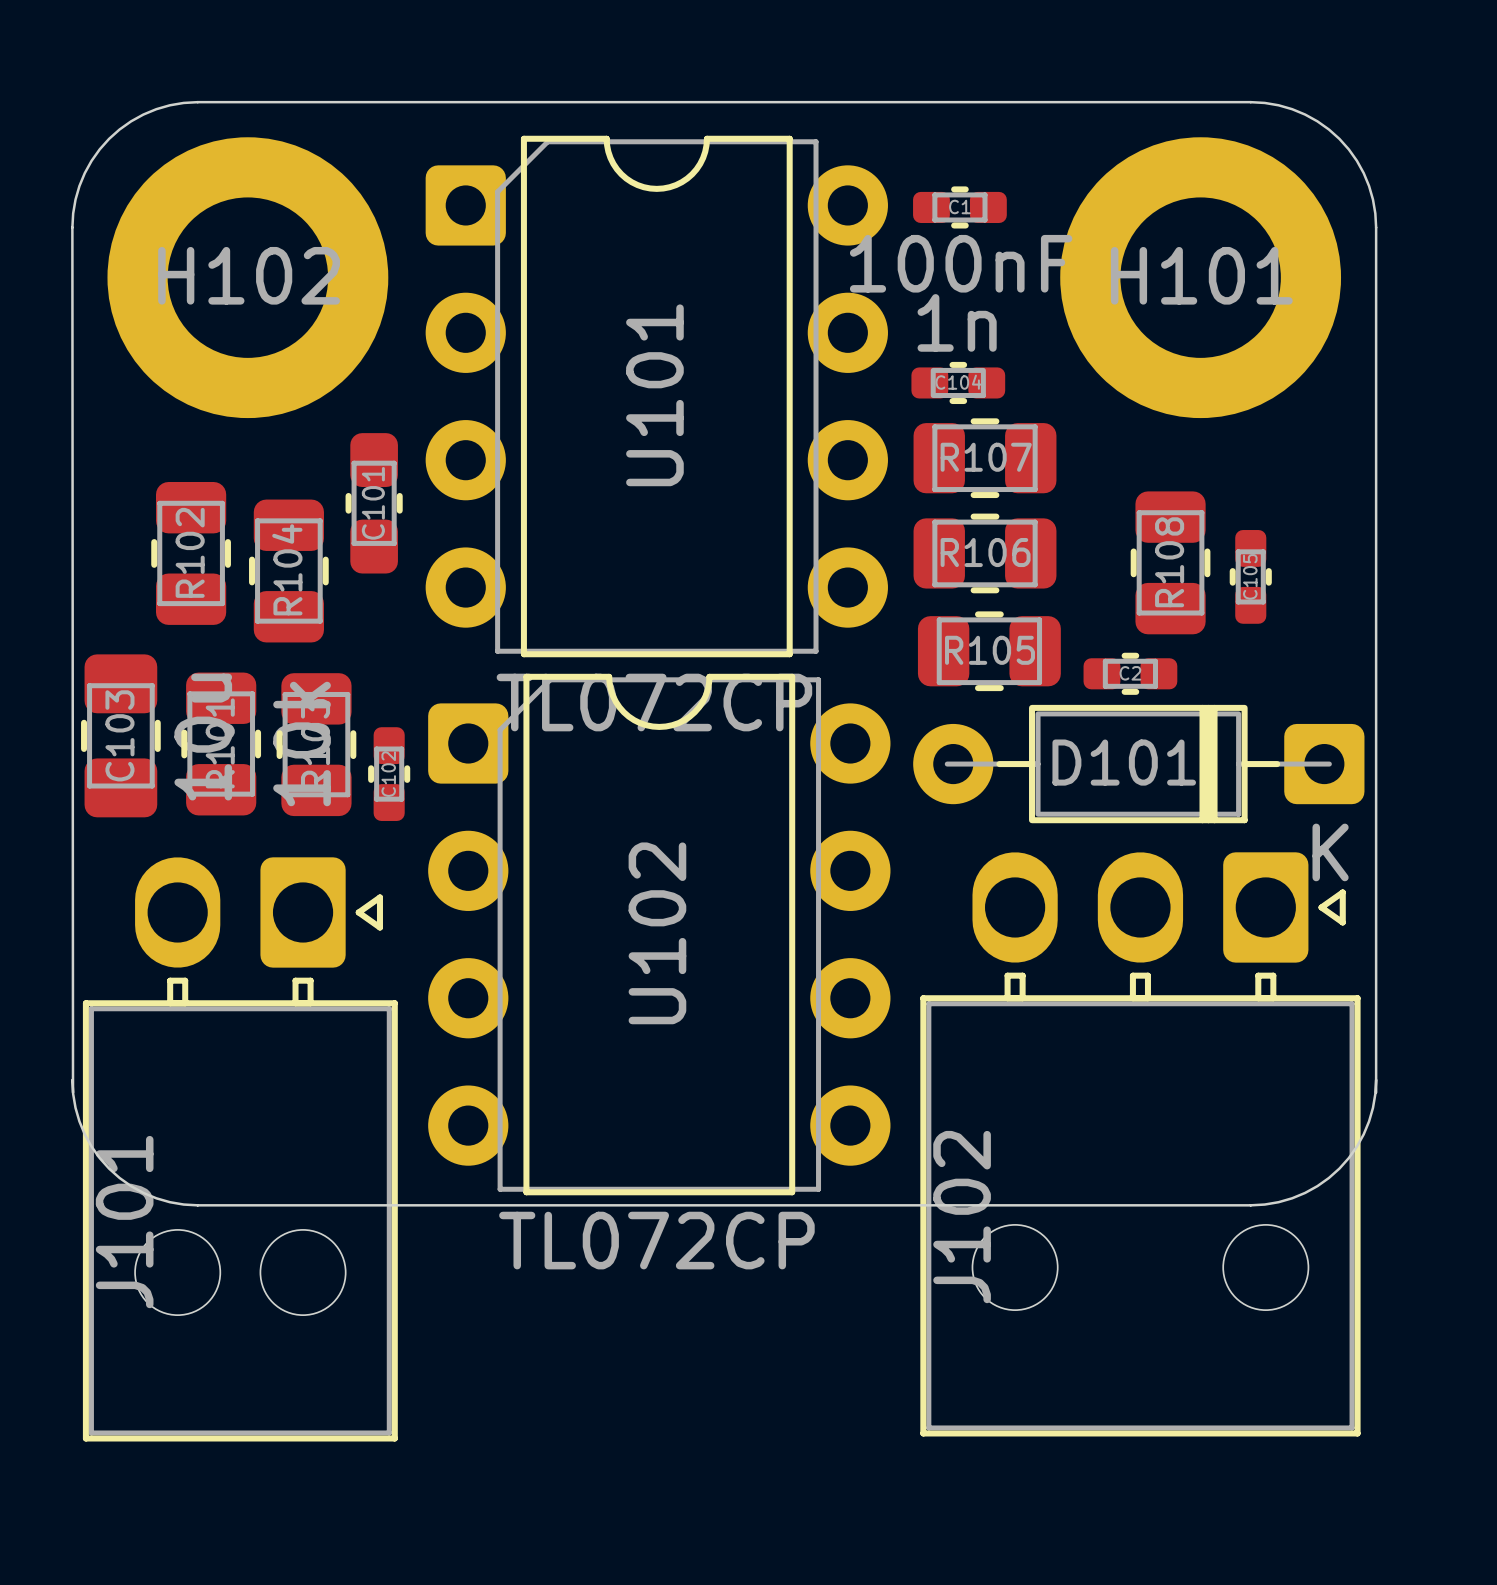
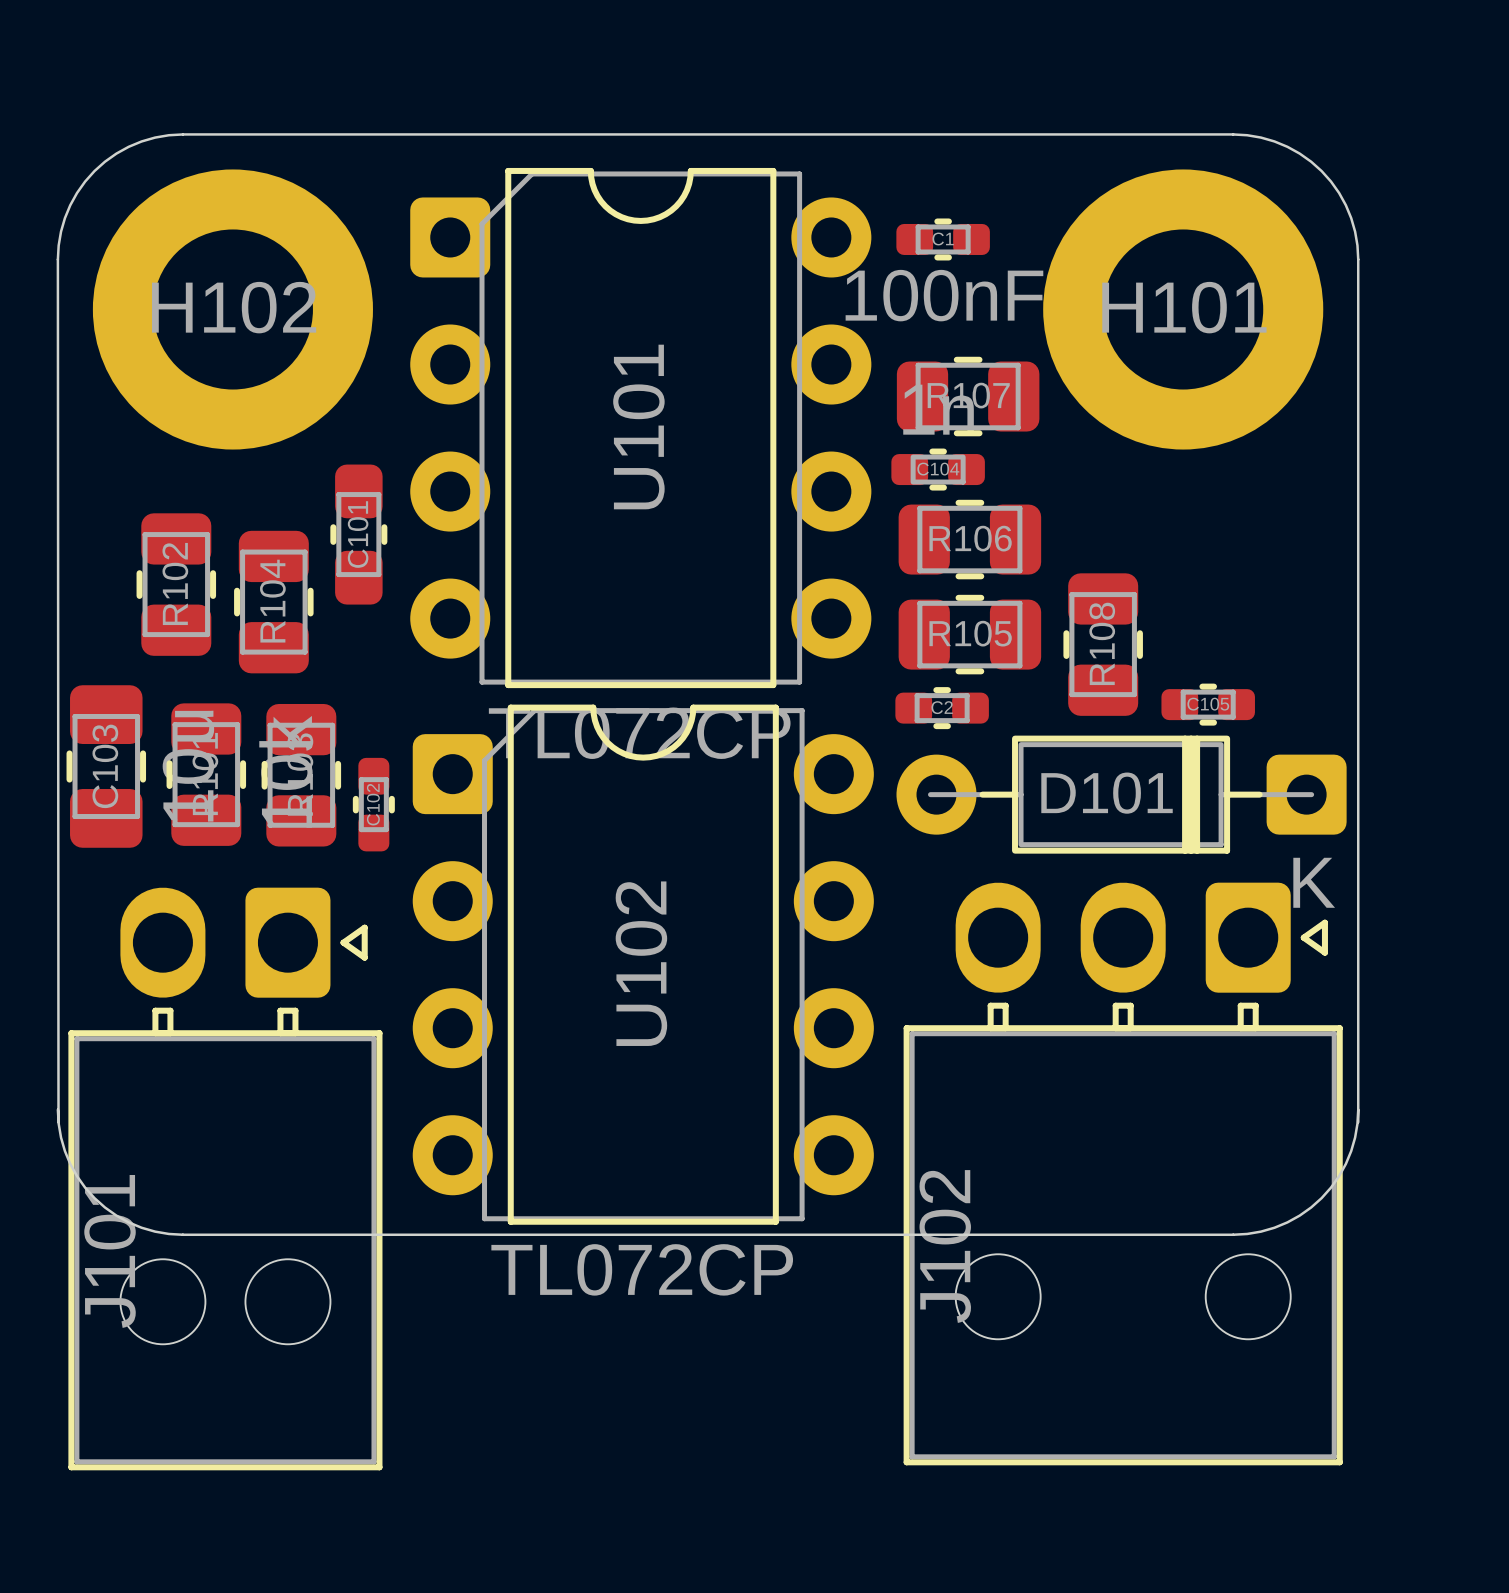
C104 position: (958, 382) -> (938, 469)
R107 position: (985, 458) -> (968, 396)
R106 position: (985, 553) -> (969, 539)
R108 position: (1170, 562) -> (1103, 644)
C105 rotation: 0° (1250, 576) -> 90° clockwise (1208, 704)
C105 position: (1250, 576) -> (1208, 704)
R105 position: (989, 651) -> (969, 634)
C2 position: (1130, 673) -> (942, 708)

